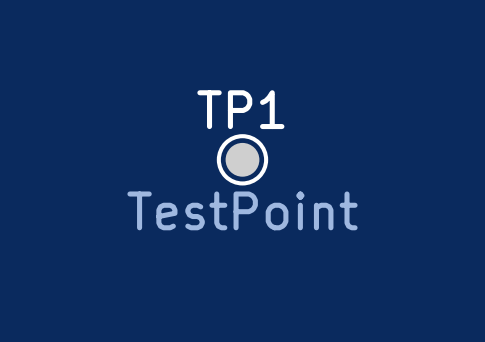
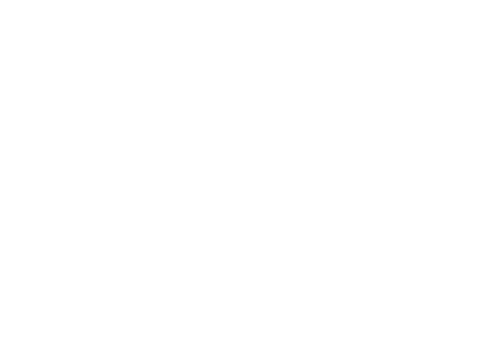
TP1: TestPoint (242, 159) -> none

